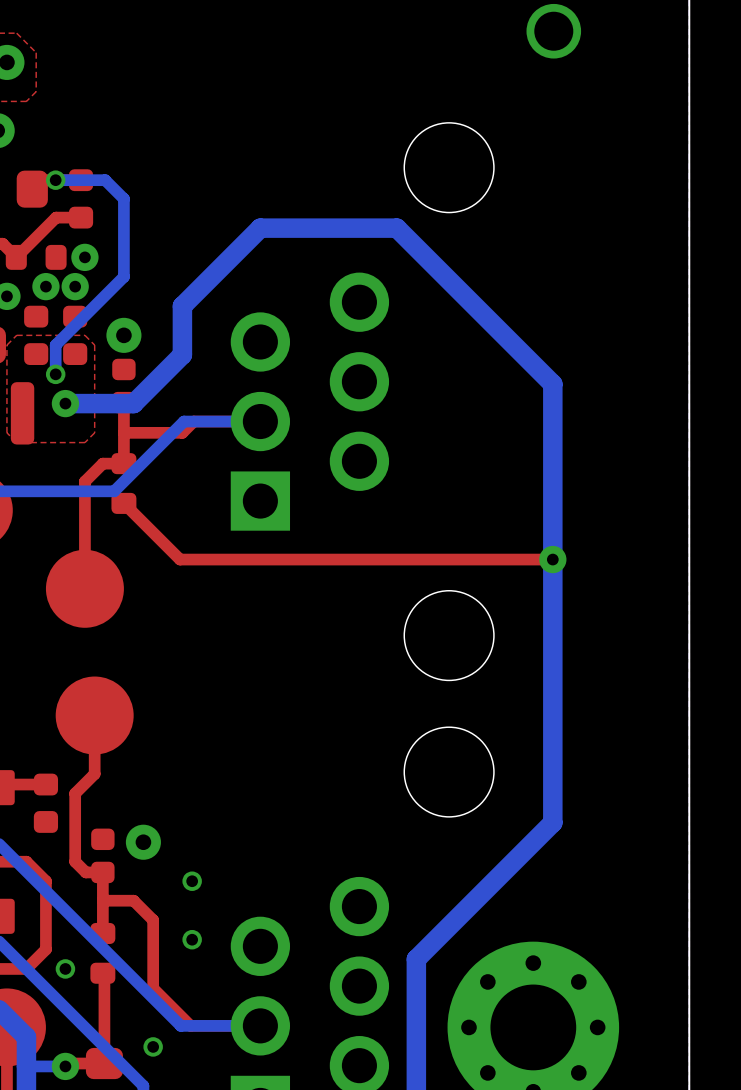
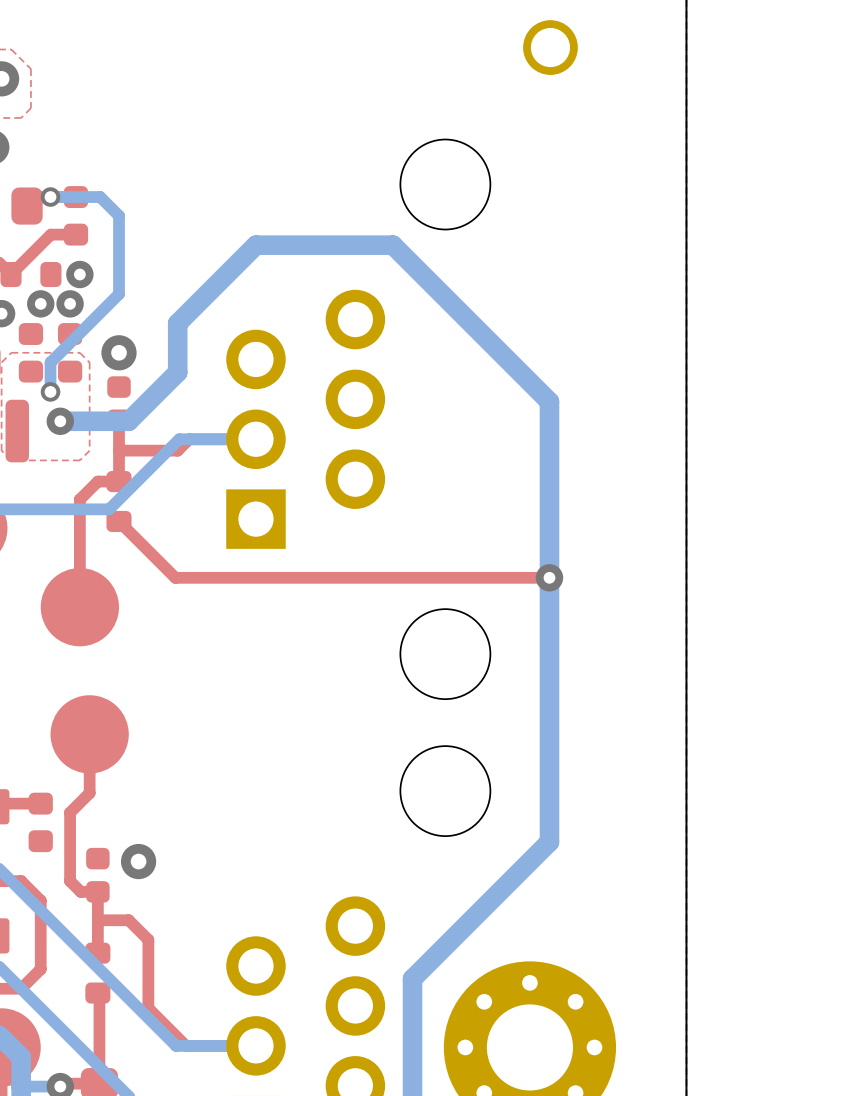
via: (192, 881) -> none
via: (192, 939) -> none
via: (65, 968) -> none
via: (153, 1046) -> none

